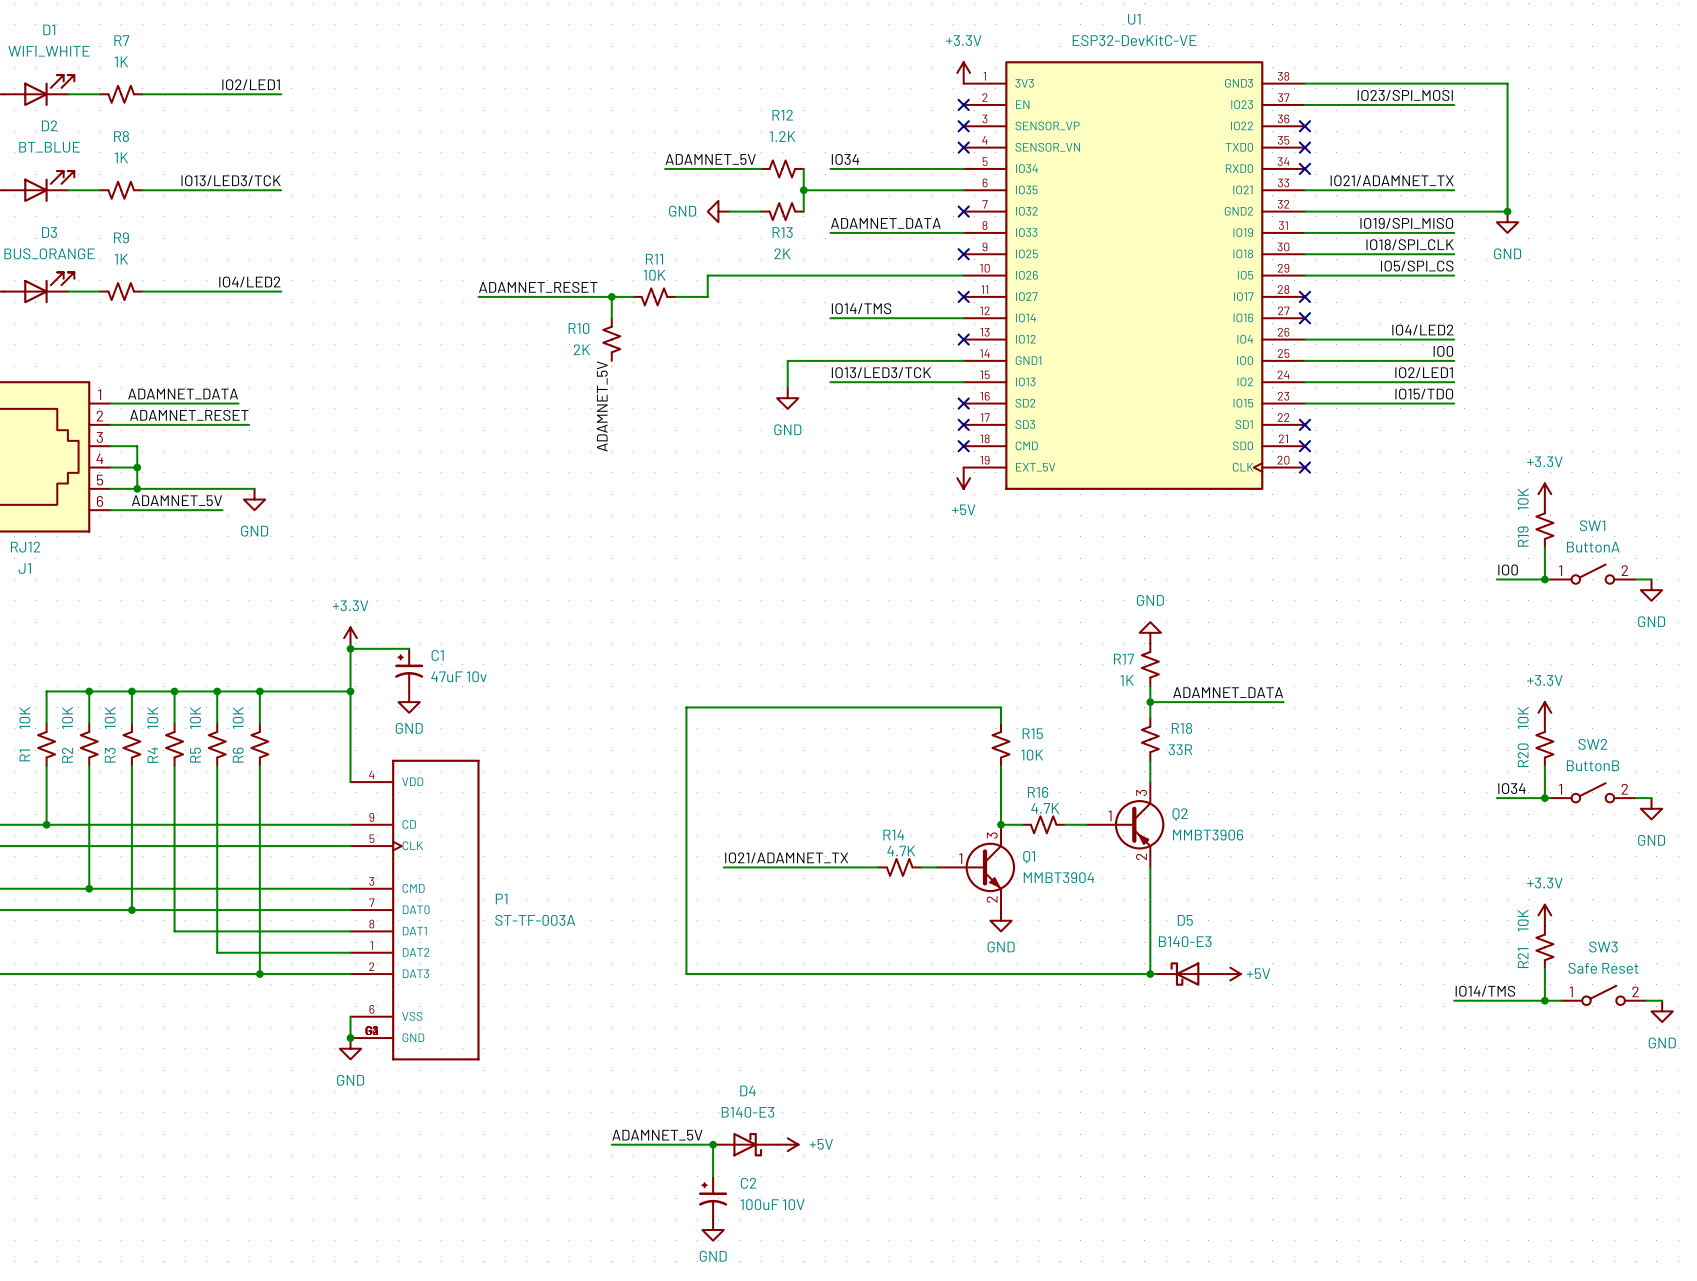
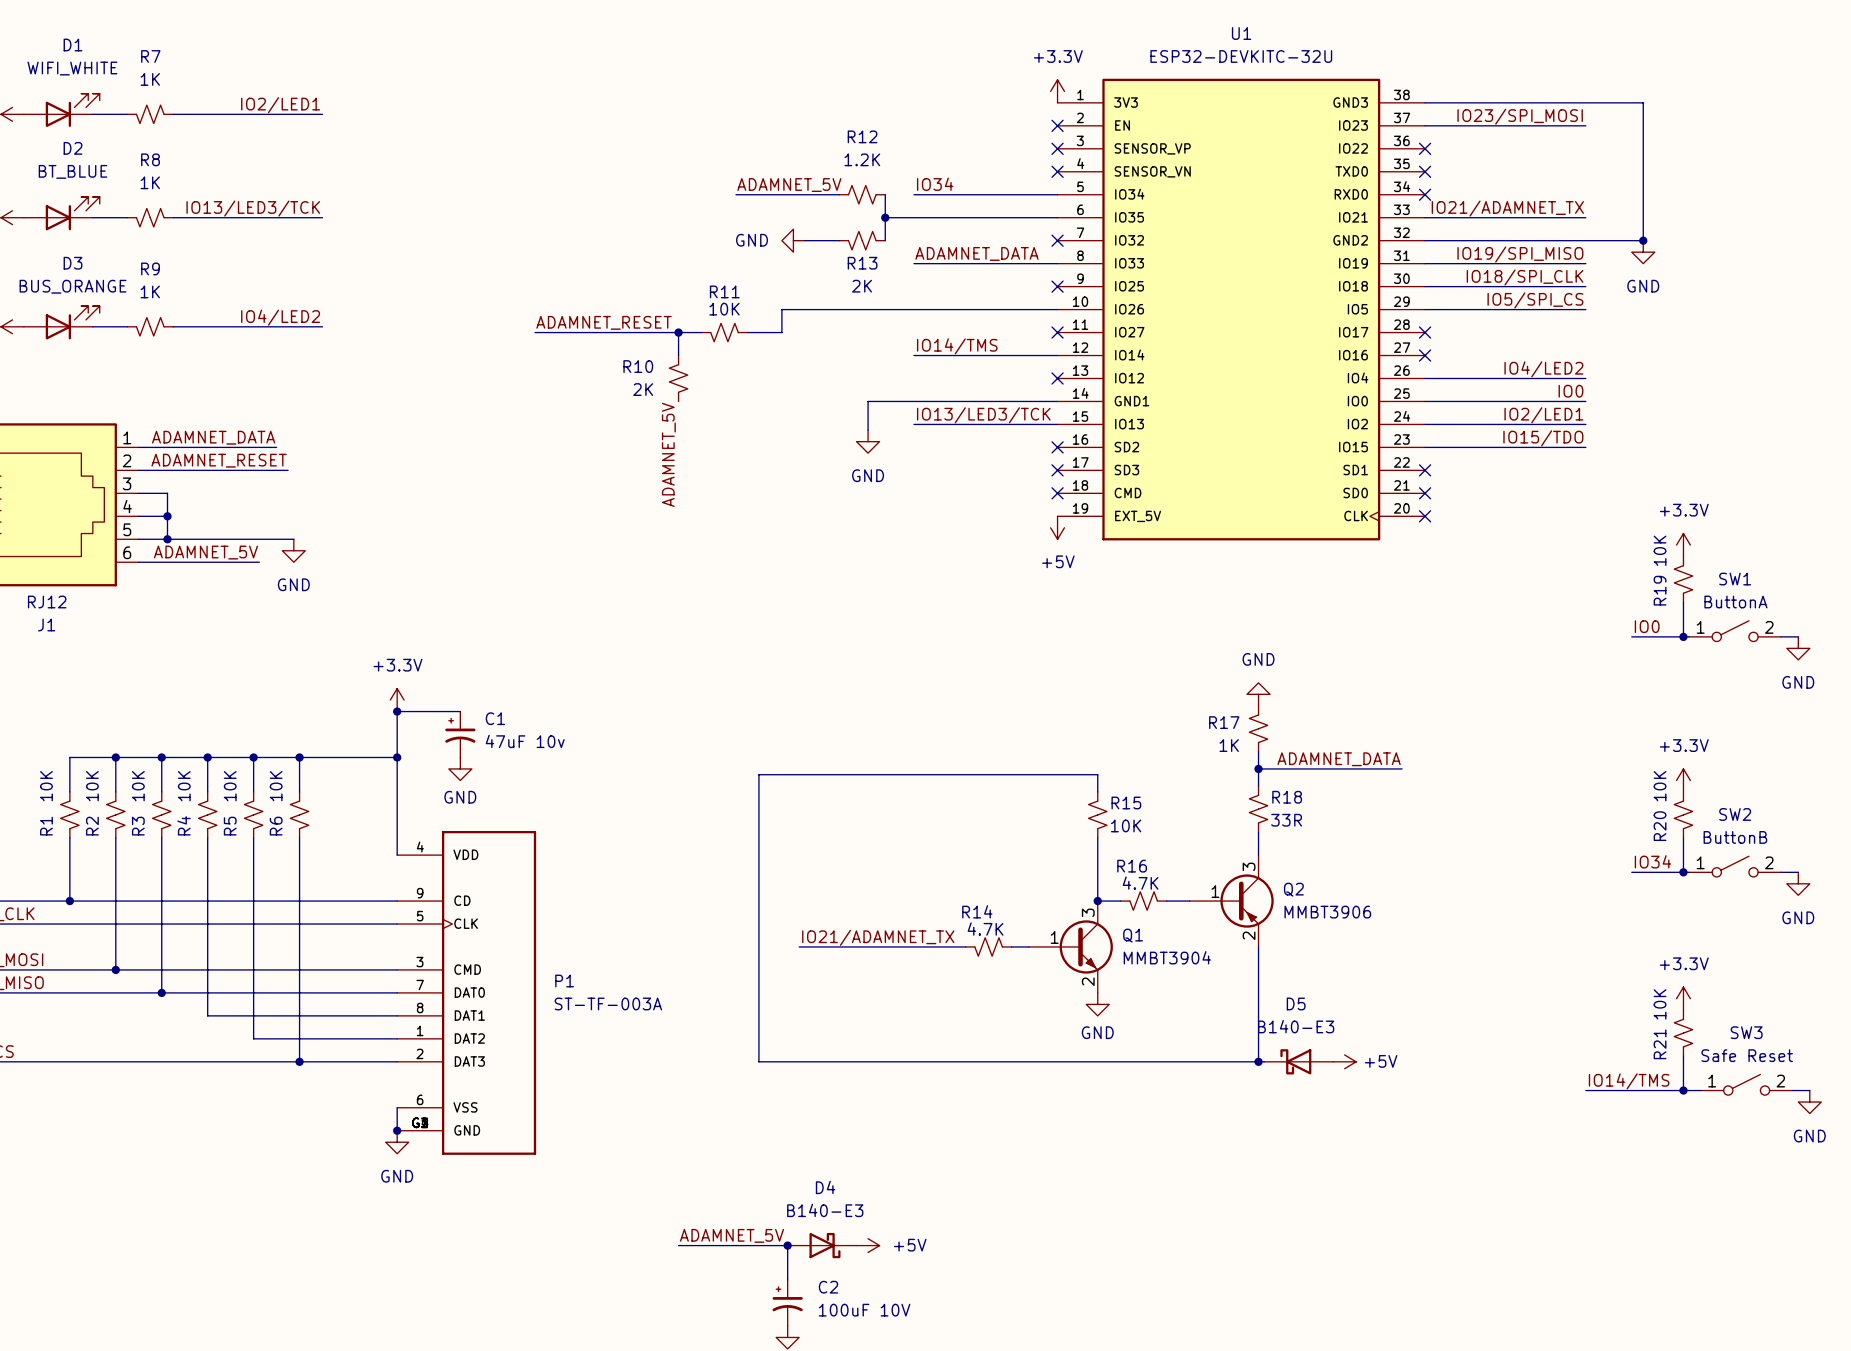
U1 value: ESP32-DevKitC-VE (1134, 40) -> ESP32-DEVKITC-32U (1241, 56)

